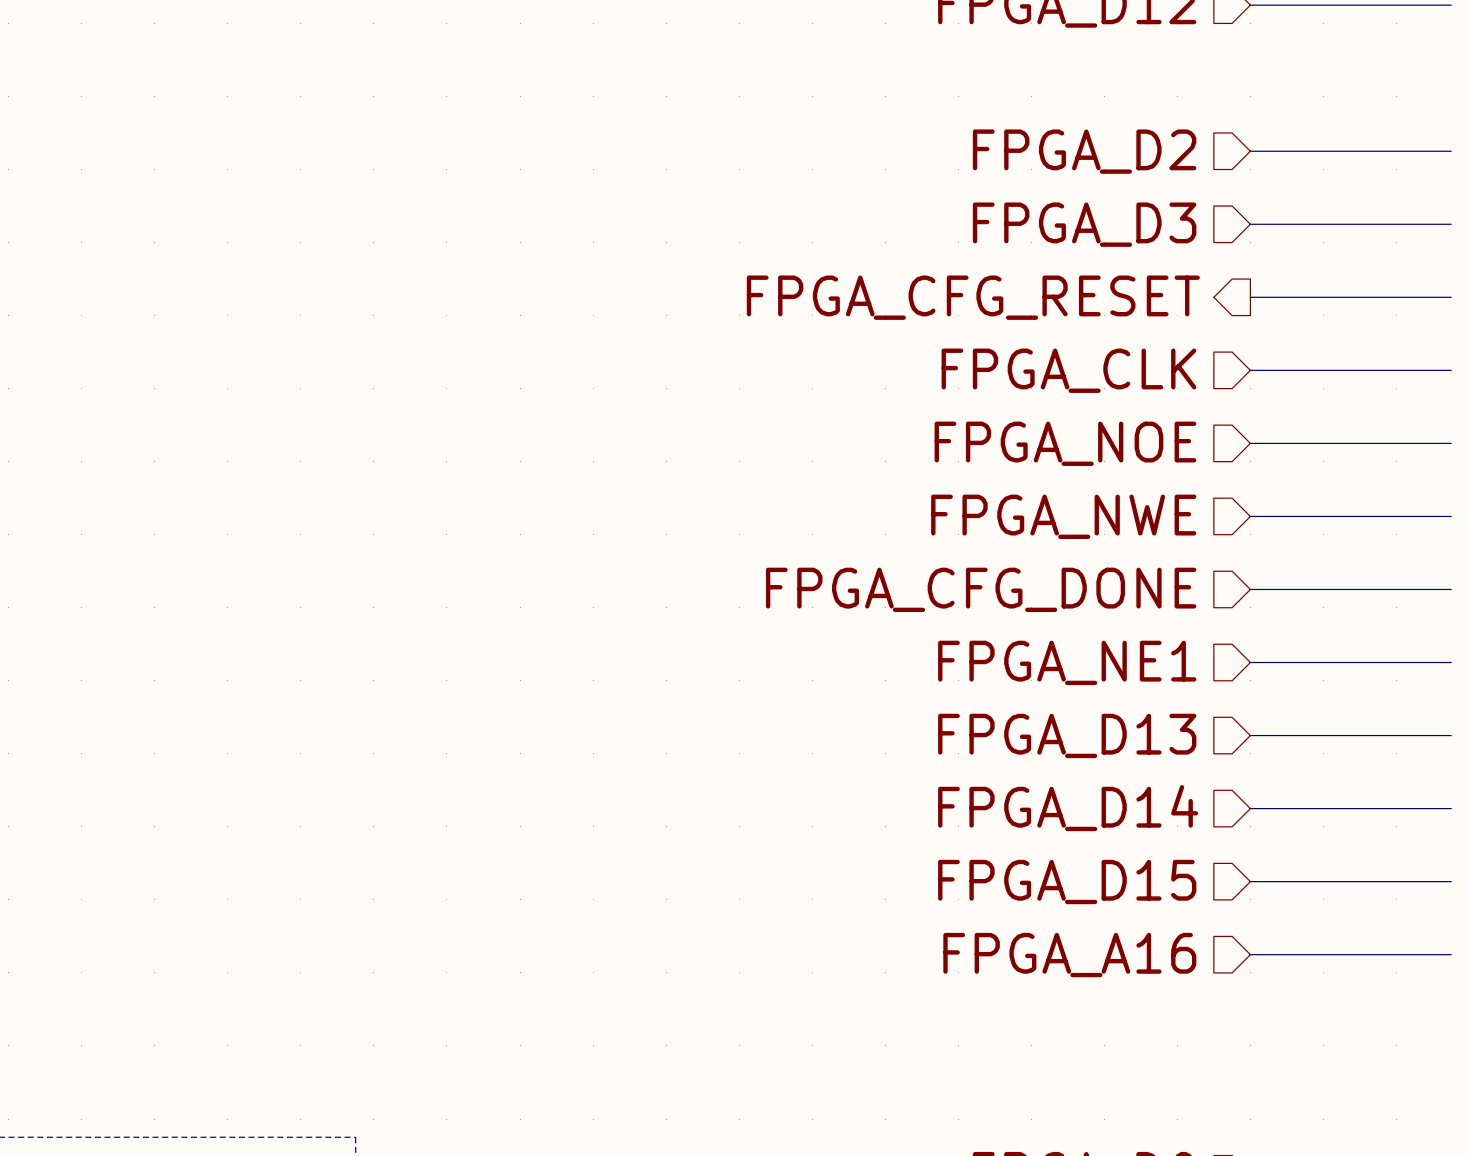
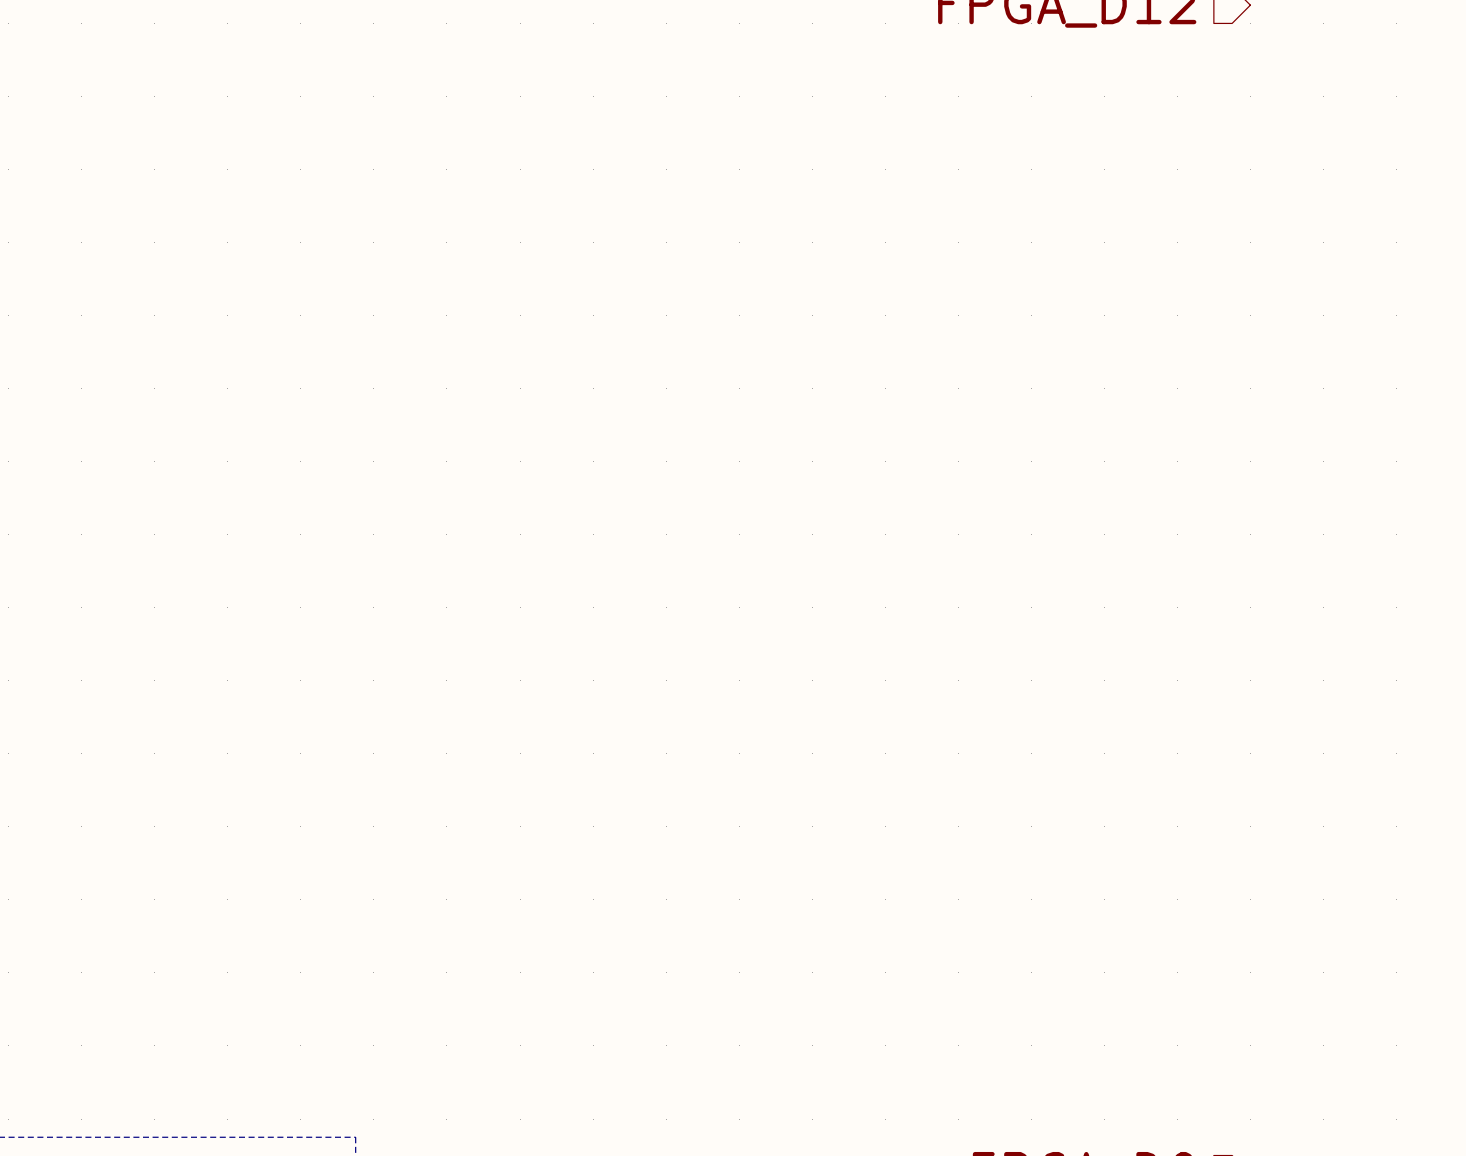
wire: (1250, 5) (1451, 5) -> none
hierarchical label: FPGA_D2 (1084, 151) -> none
wire: (1250, 151) (1451, 151) -> none
hierarchical label: FPGA_D3 (1084, 224) -> none
wire: (1250, 224) (1451, 224) -> none
hierarchical label: FPGA_CFG_RESET (973, 297) -> none
wire: (1250, 297) (1451, 297) -> none
hierarchical label: FPGA_CLK (1068, 370) -> none
wire: (1250, 370) (1451, 370) -> none
hierarchical label: FPGA_NOE (1065, 443) -> none
wire: (1250, 443) (1451, 443) -> none
hierarchical label: FPGA_NWE (1063, 516) -> none
wire: (1250, 516) (1451, 516) -> none
hierarchical label: FPGA_CFG_DONE (981, 589) -> none
wire: (1250, 589) (1451, 589) -> none
hierarchical label: FPGA_NE1 (1067, 662) -> none
wire: (1250, 662) (1451, 662) -> none
hierarchical label: FPGA_D13 (1067, 735) -> none
wire: (1250, 735) (1451, 735) -> none
hierarchical label: FPGA_D14 (1068, 808) -> none
wire: (1250, 808) (1451, 808) -> none
wire: (1250, 881) (1451, 881) -> none
hierarchical label: FPGA_D15 (1067, 882) -> none
wire: (1250, 954) (1451, 954) -> none
hierarchical label: FPGA_A16 (1069, 955) -> none

